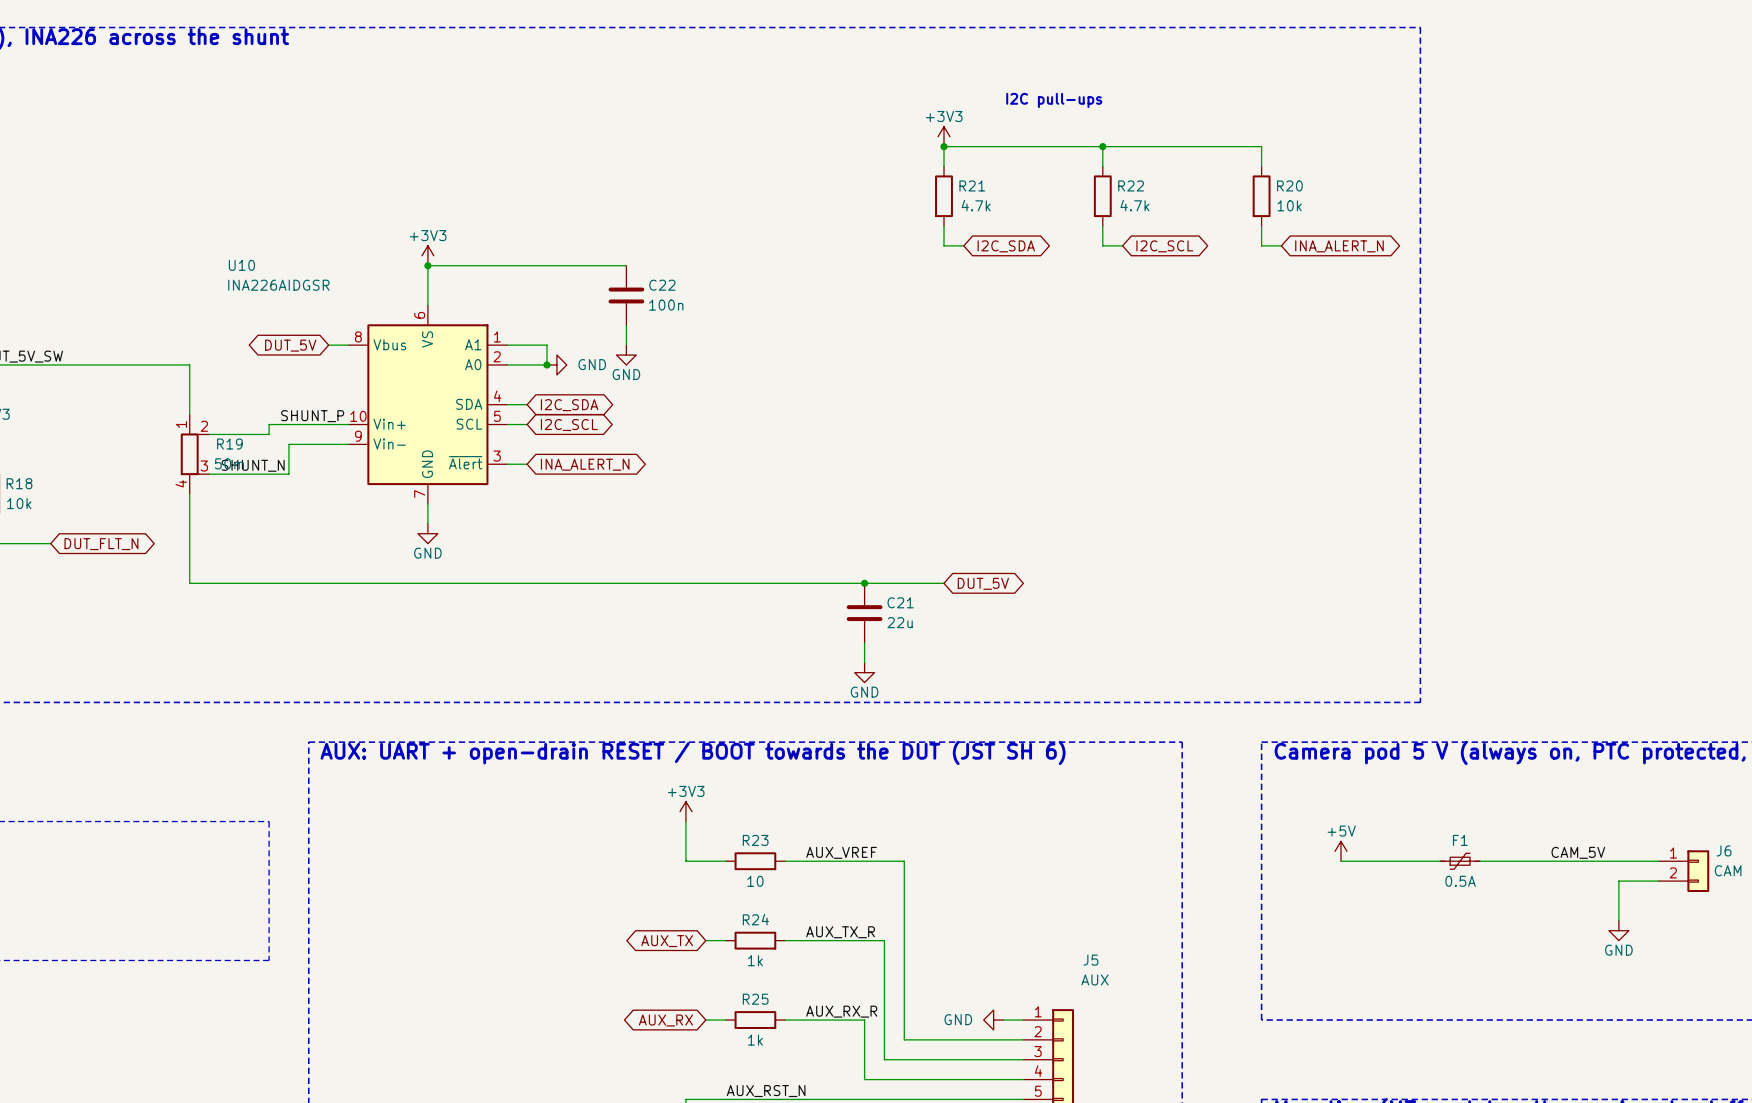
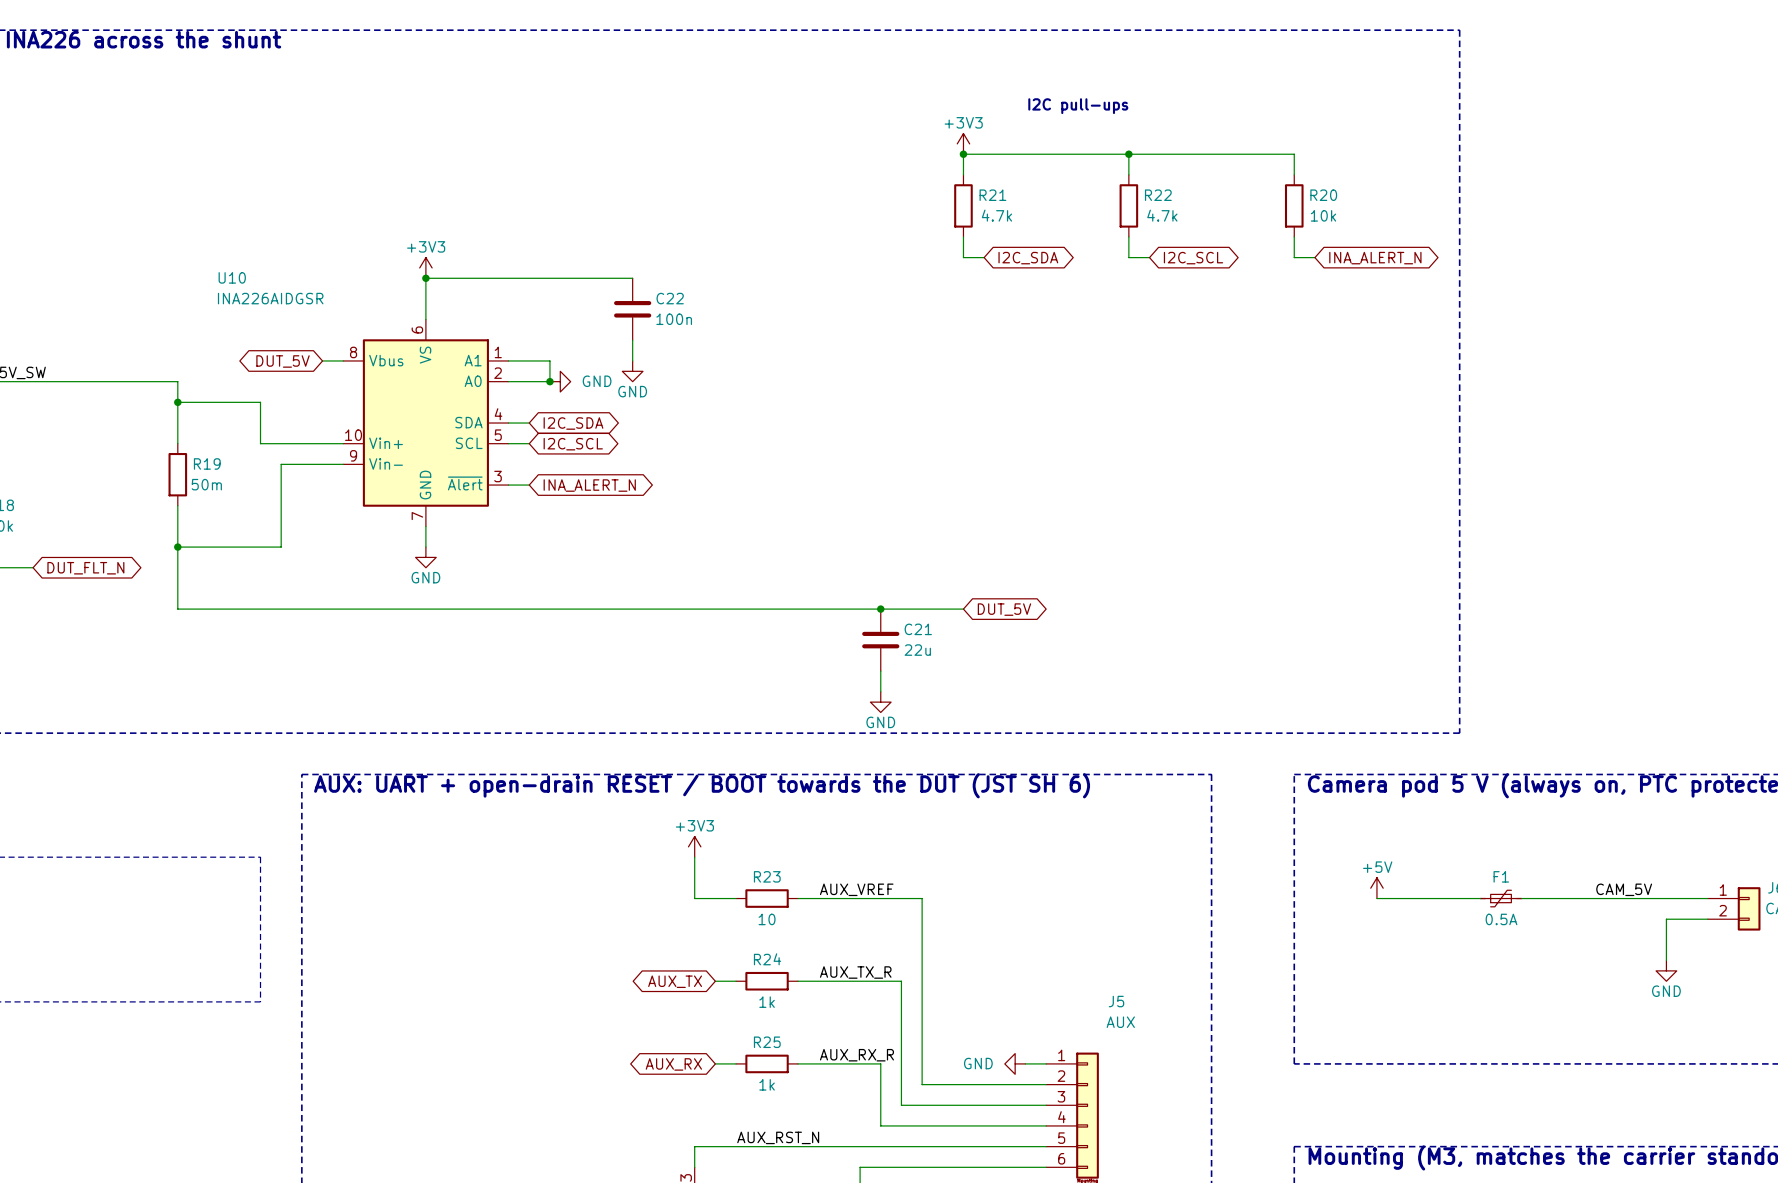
junction: none -> (177, 402)
R19 symbol: [180, 414, 210, 495] -> [168, 443, 188, 506]
label: SHUNT_P (312, 416) -> none
wire: (269, 424) (269, 434) (209, 434) -> (260, 443) (260, 402) (177, 402)
label: SHUNT_N (253, 465) -> none
wire: (209, 474) (288, 474) -> (177, 547) (281, 547) (281, 495)
junction: none -> (177, 547)

